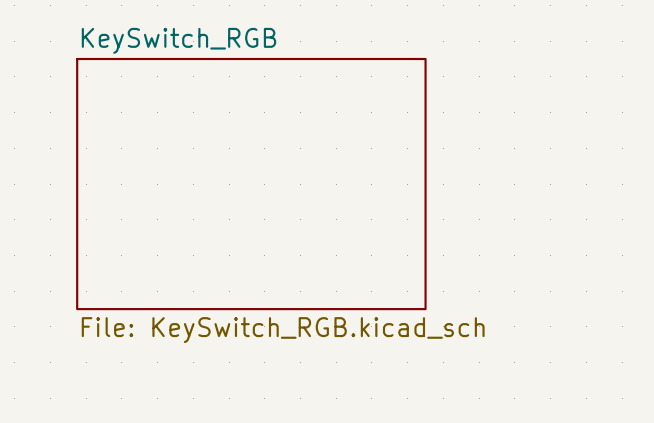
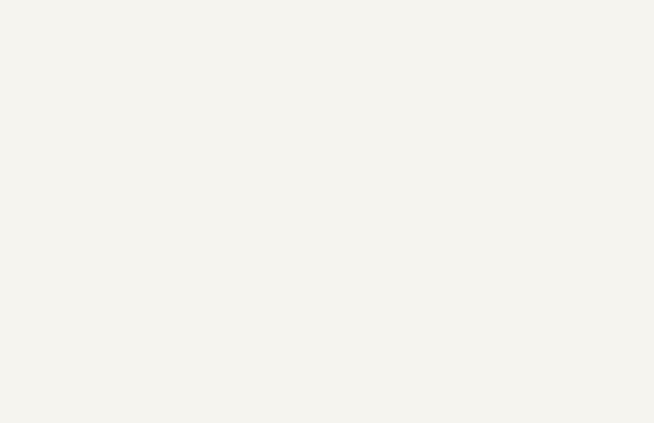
sheet KeySwitch_RGB: File: KeySwitch_RGB.kicad_sch (251, 184) -> none

